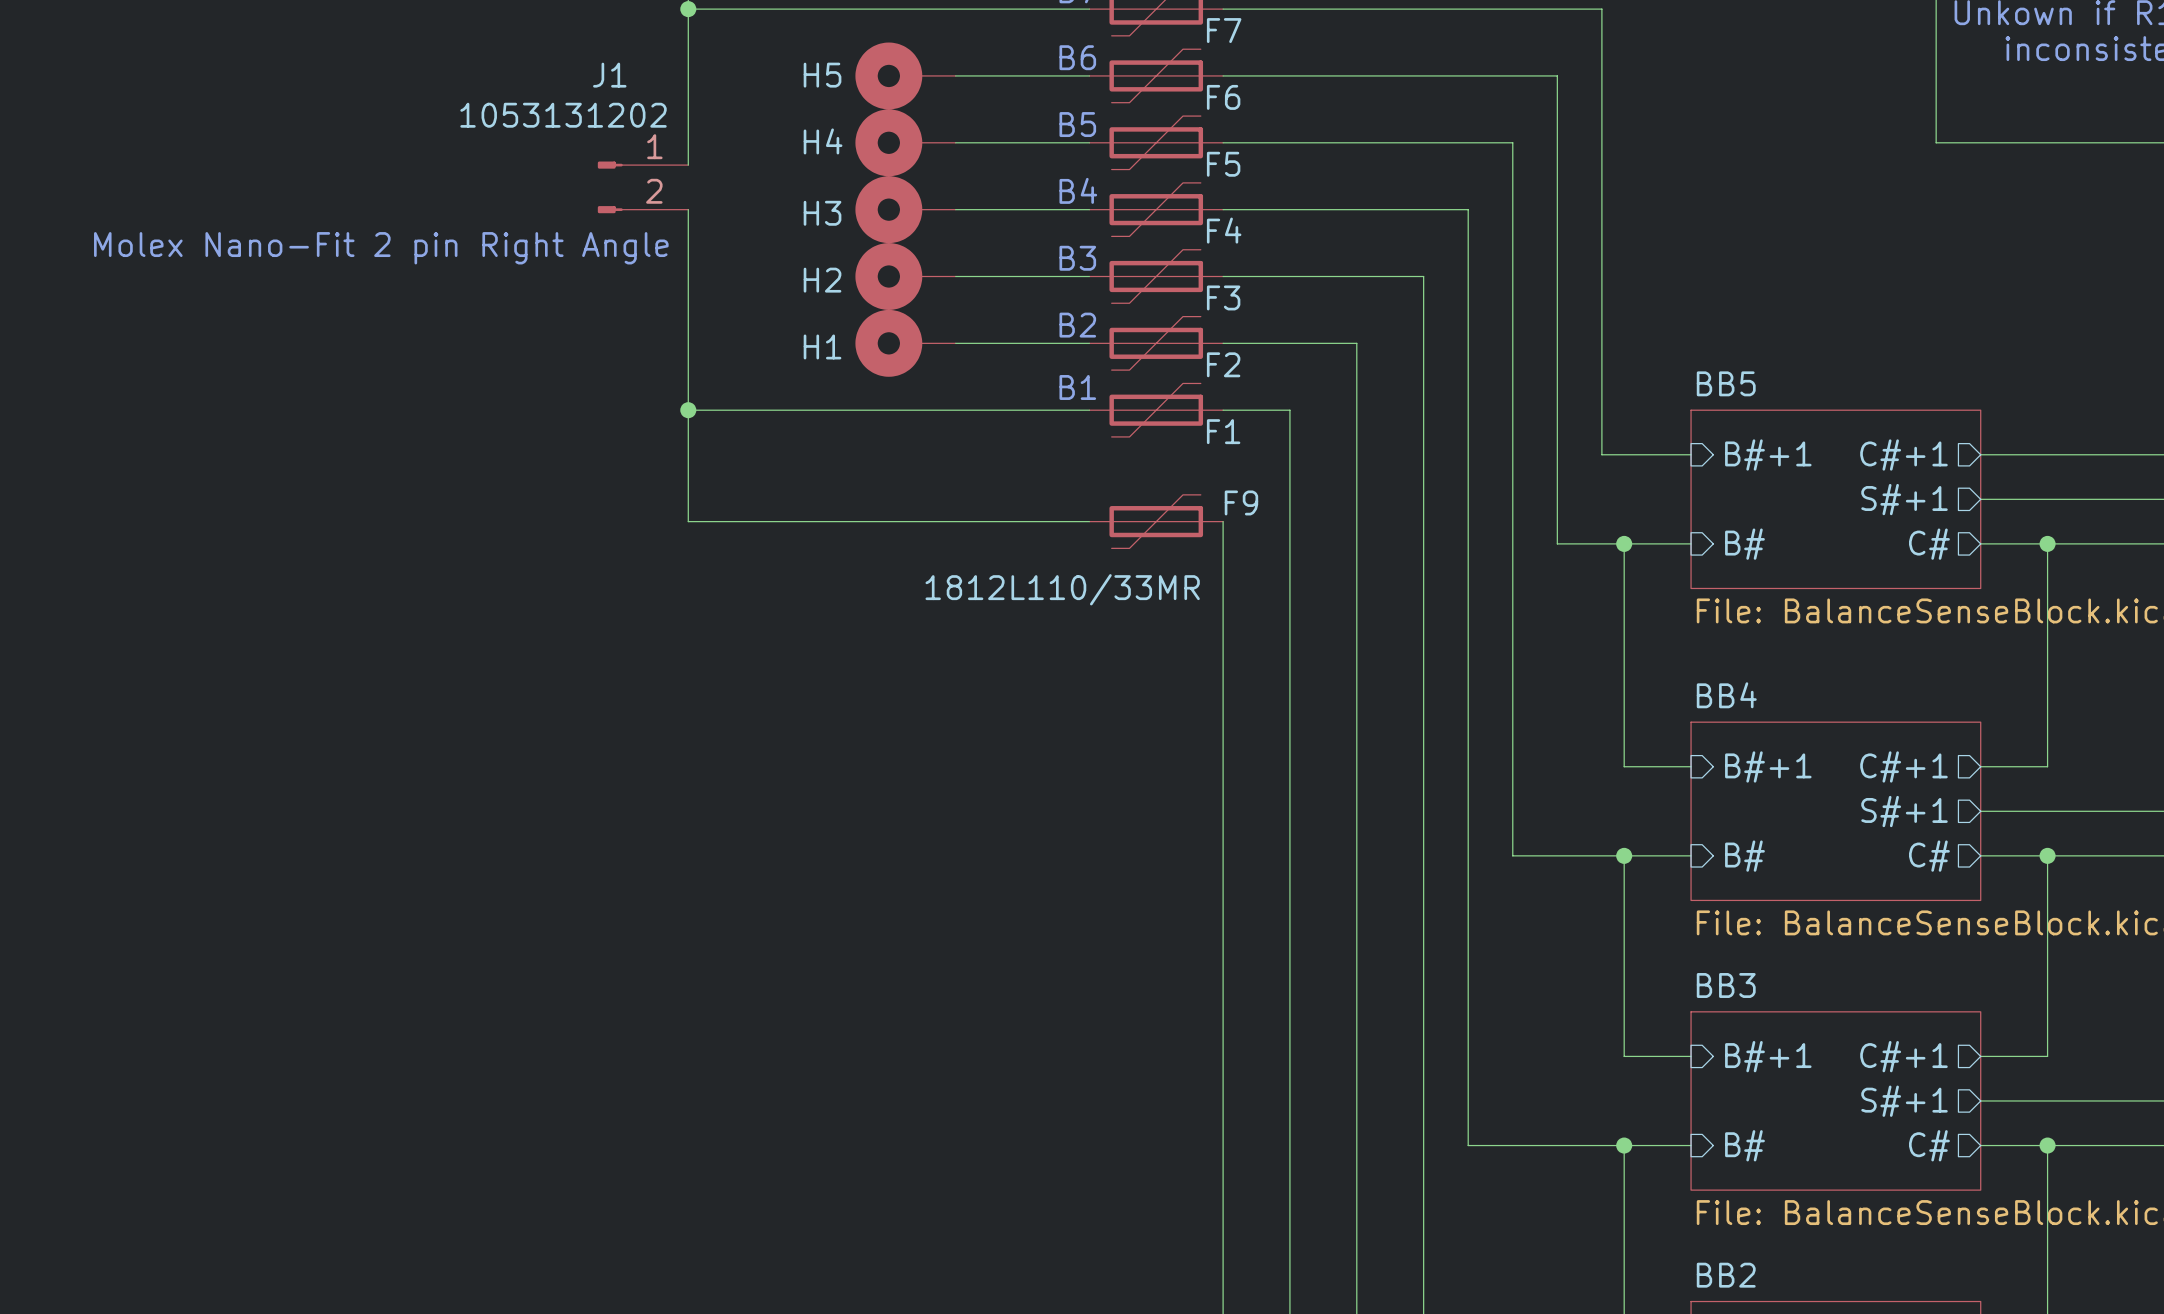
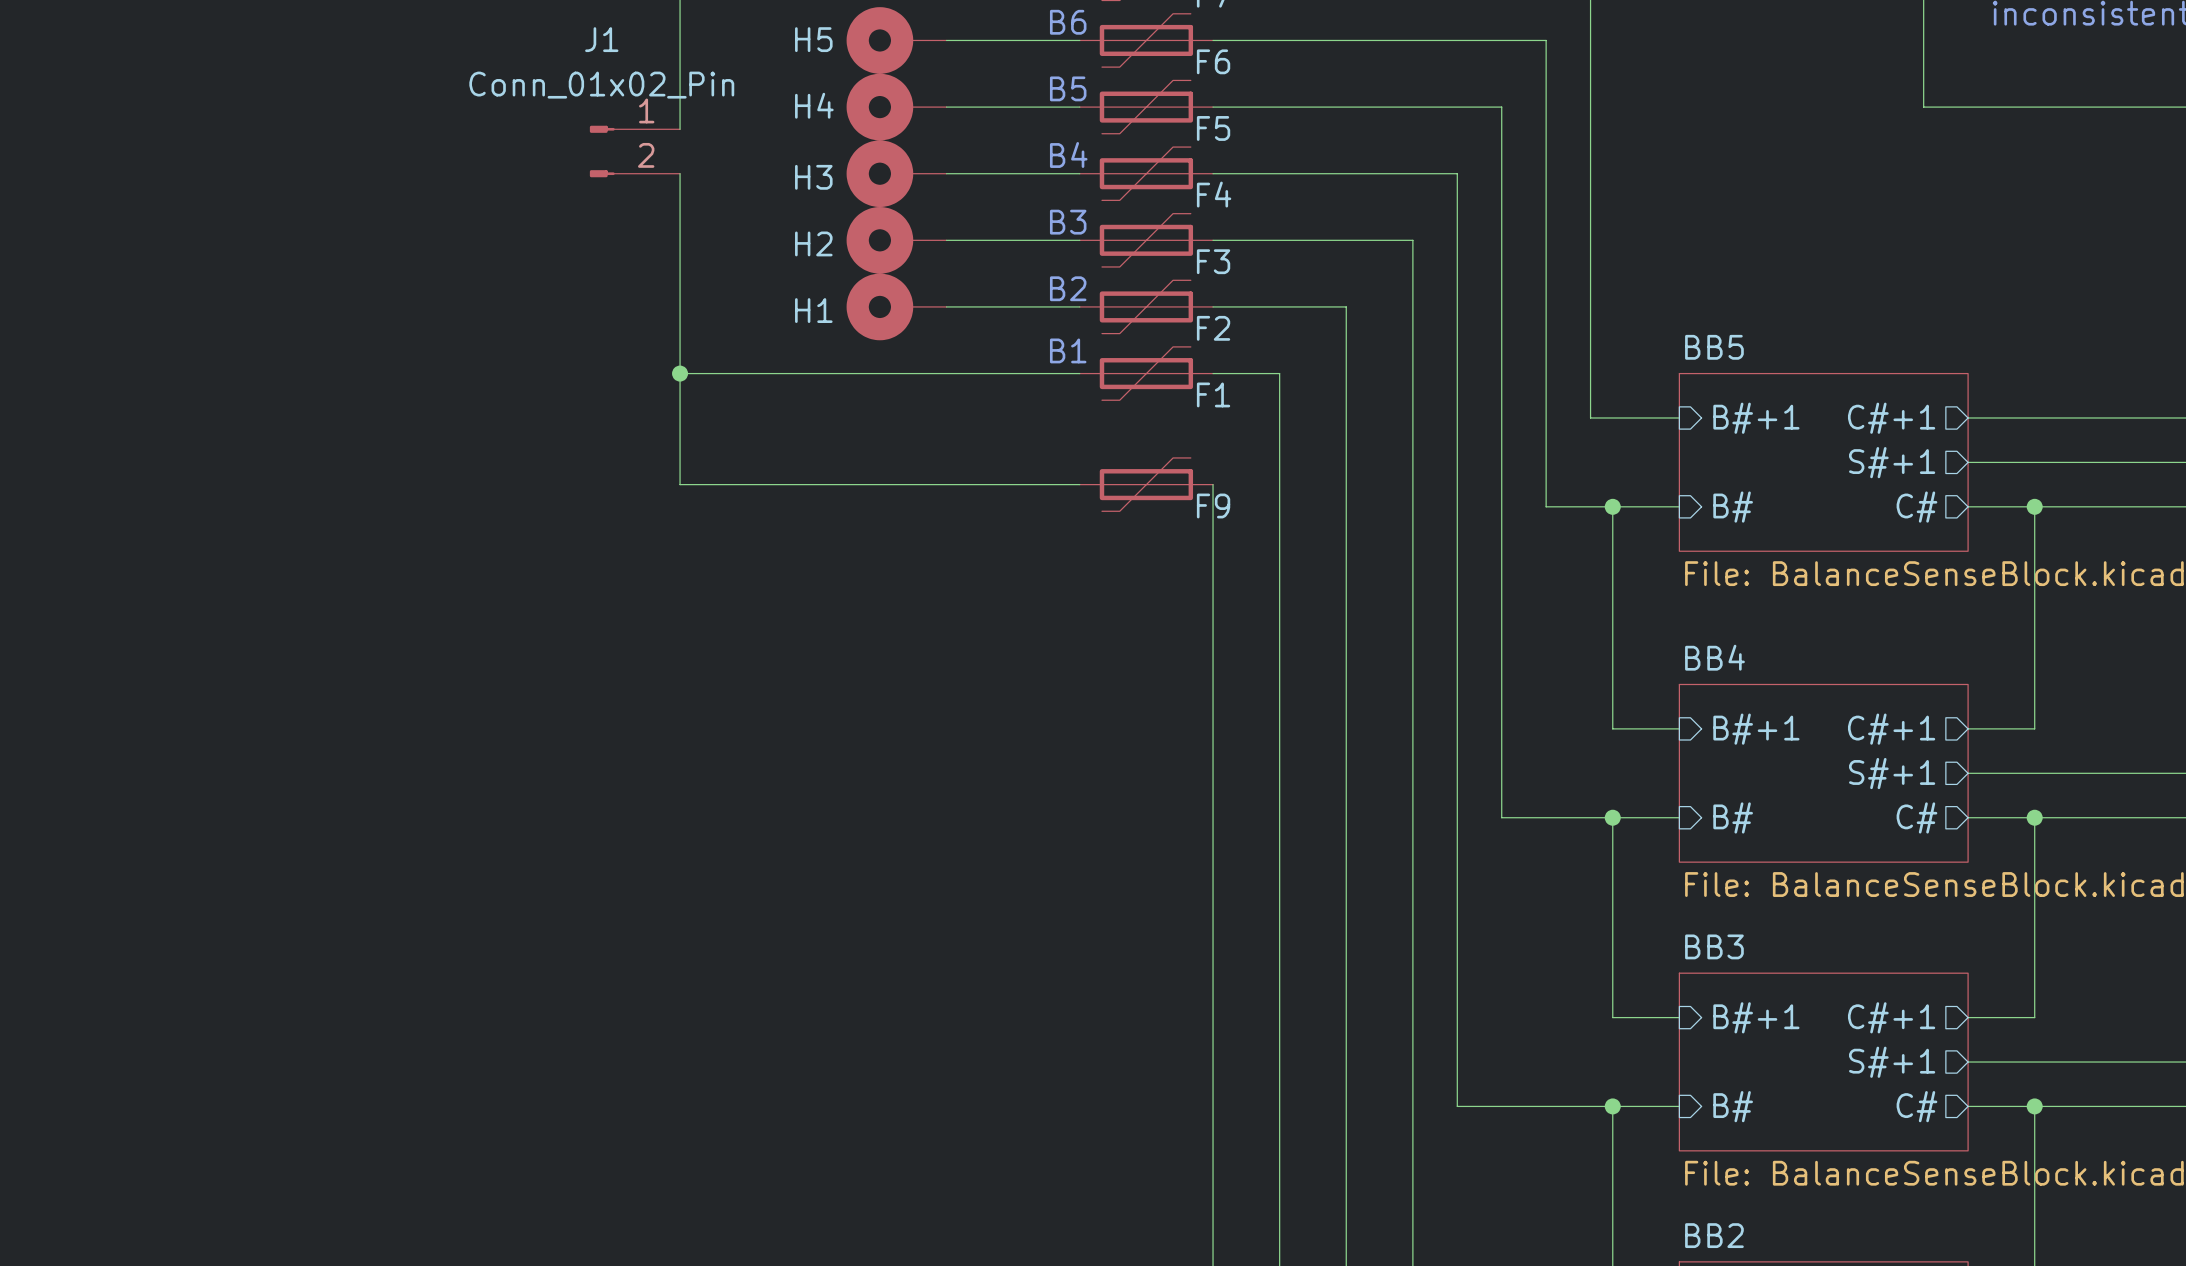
J1 value: 1053131202 (563, 115) -> Conn_01x02_Pin (601, 85)
text: Molex Nano-Fit 2 pin Right Angle (381, 248) -> none
F9 name position: F9 (1241, 502) -> F9 (1213, 505)
F9 value: 1812L110/33MR (1062, 589) -> none

